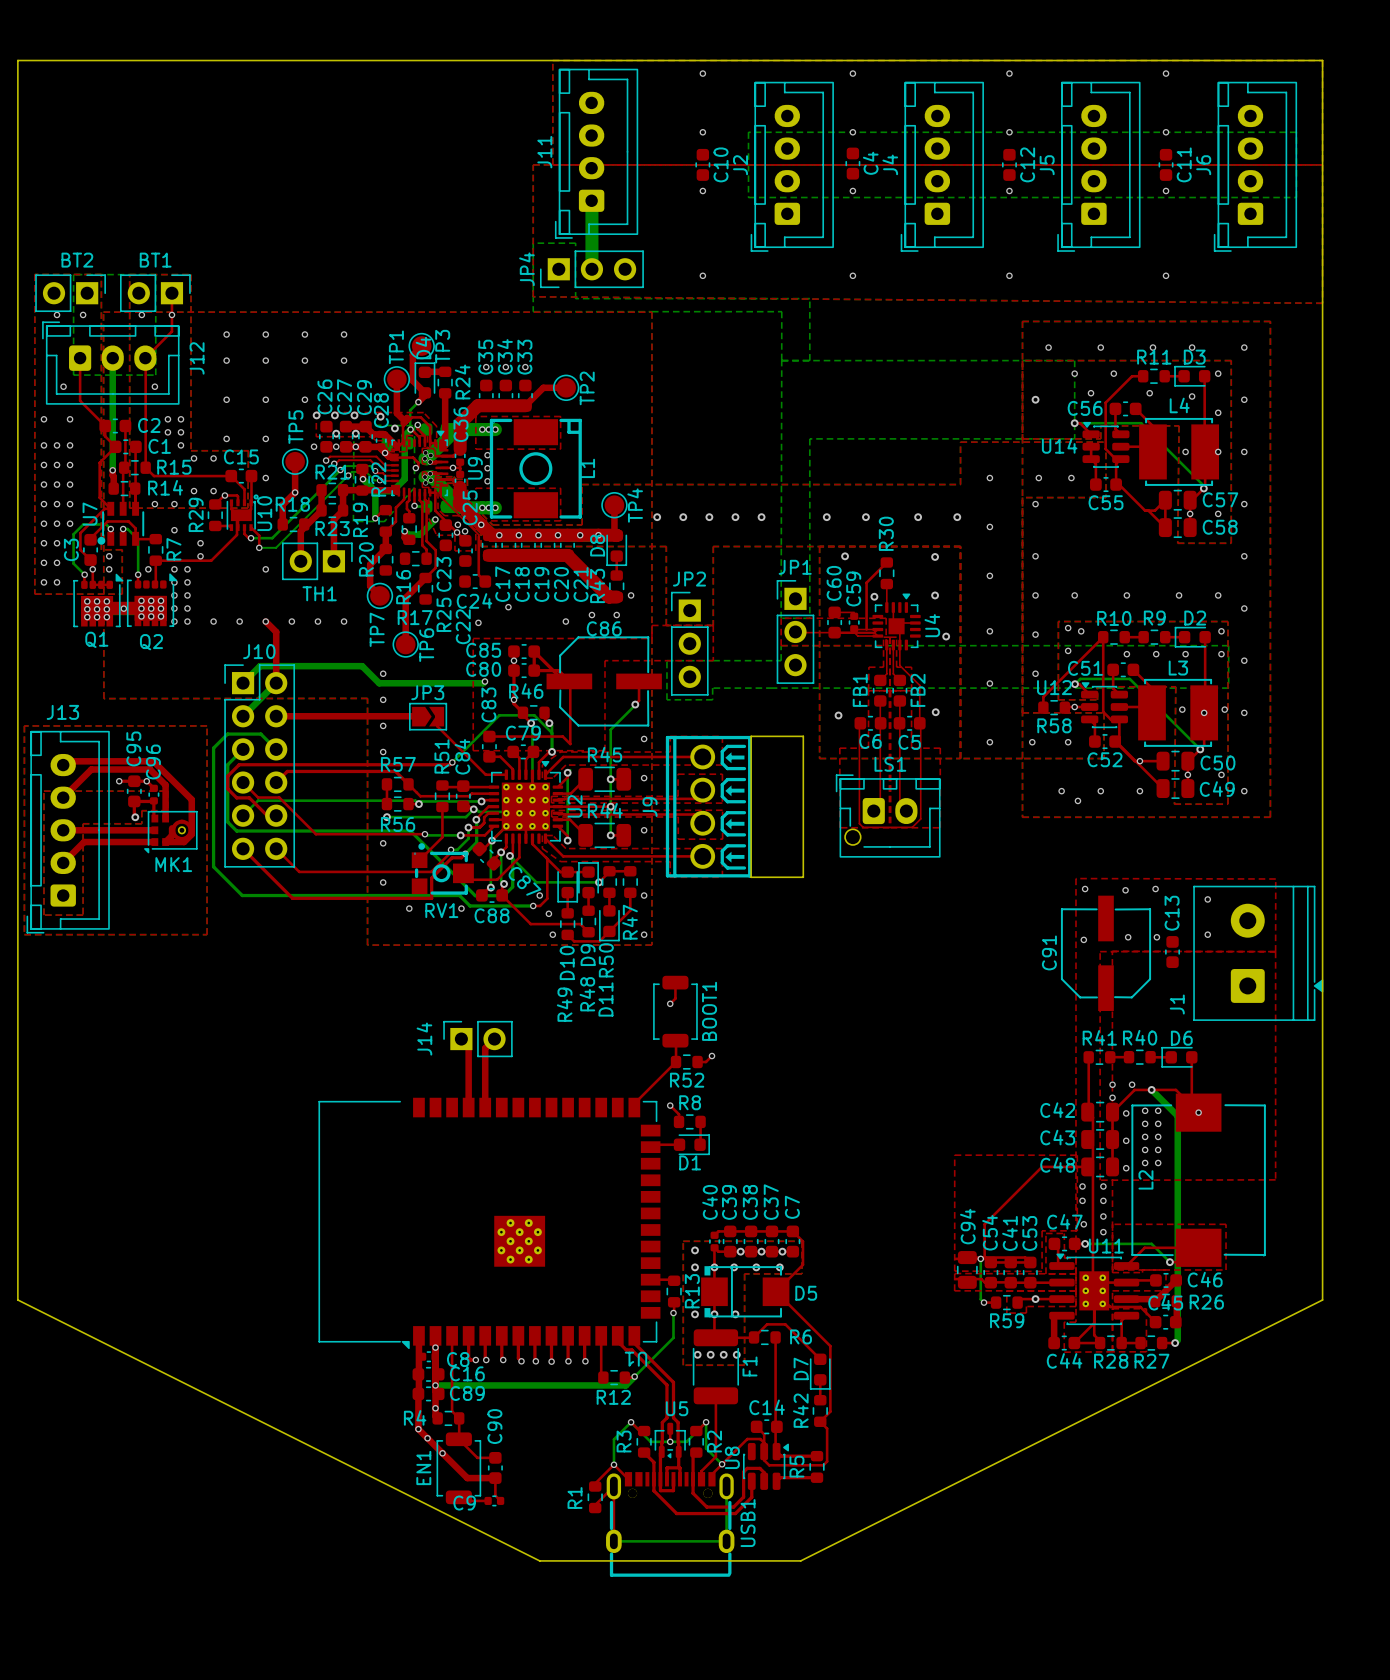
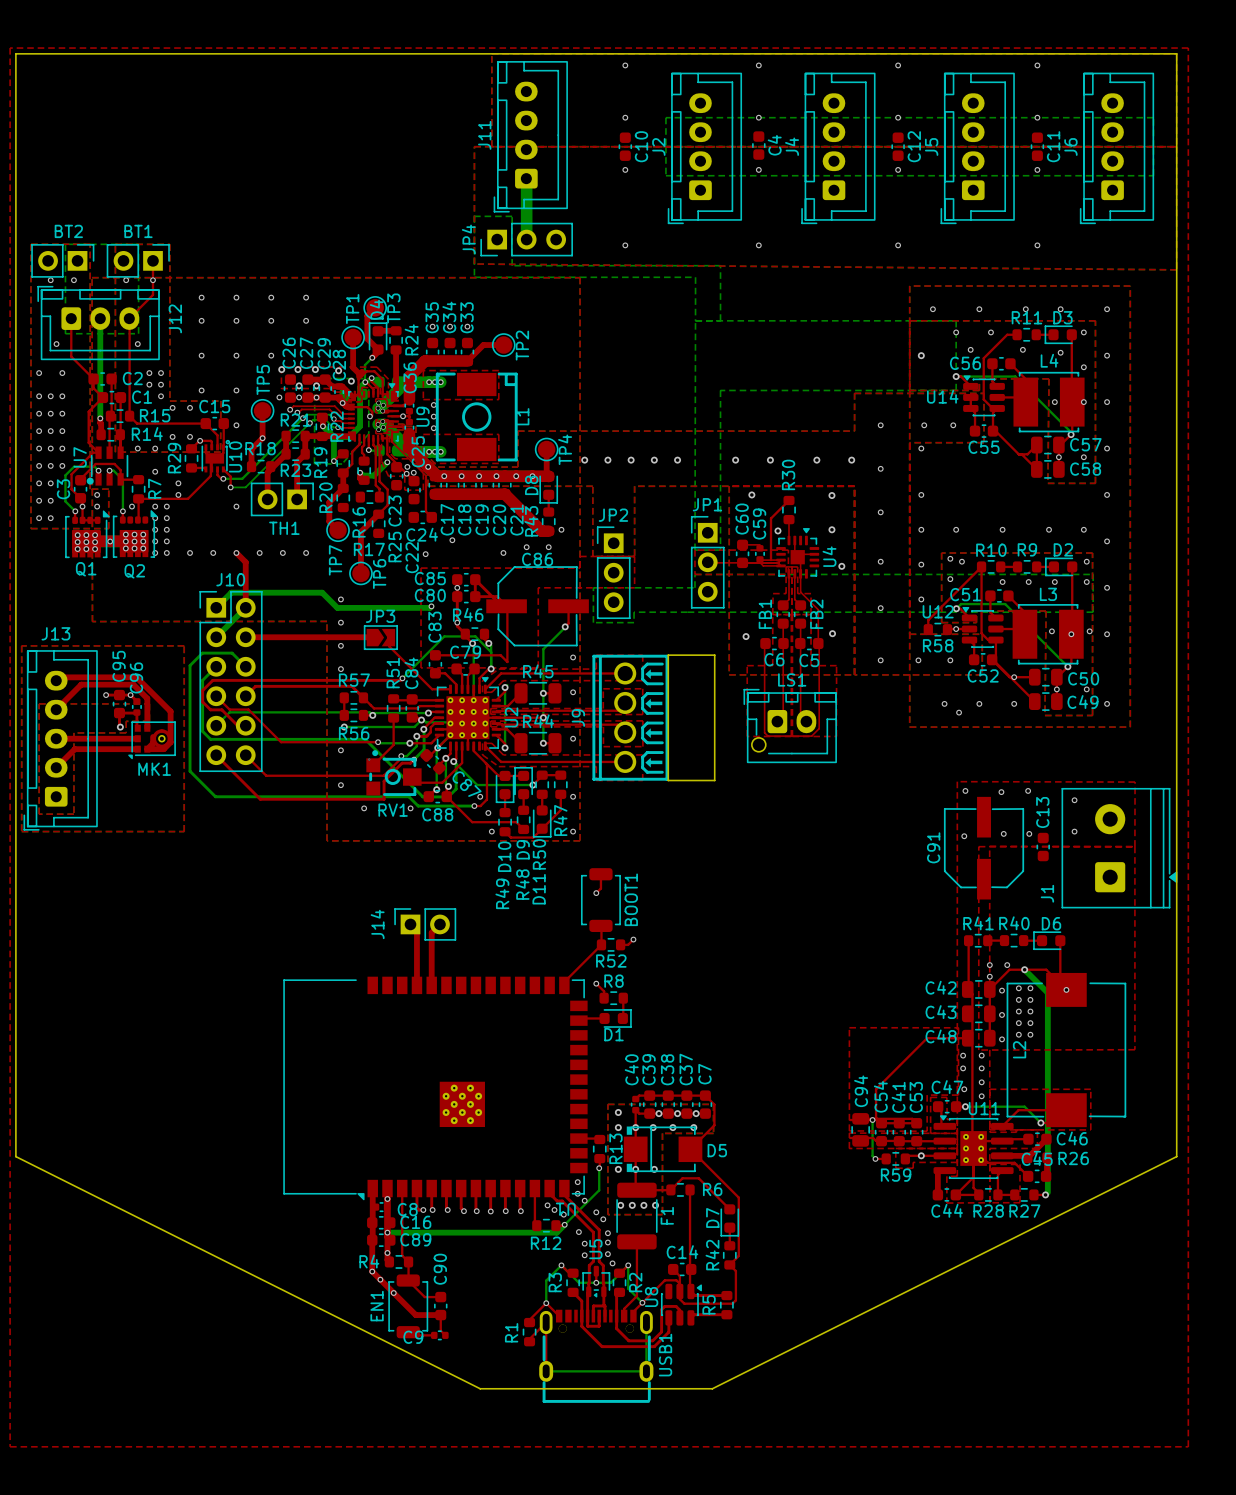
top zone outline: none -> (10, 48) (10, 1446) (1188, 1446) (1188, 48) (10, 48)
via: none -> (577, 1182)
via: none -> (577, 1193)
via: none -> (584, 1200)
via: none -> (547, 1205)
via: none -> (554, 1210)
via: none -> (596, 1212)
via: none -> (563, 1214)
via: none -> (603, 1219)
via: none -> (578, 1232)
via: none -> (607, 1233)
via: none -> (607, 1242)
via: none -> (584, 1243)
U5 name rotation: 0° (677, 1408) -> 90° counterclockwise (595, 1249)
via: none -> (607, 1254)
via: none -> (584, 1255)
via: none -> (612, 1263)

